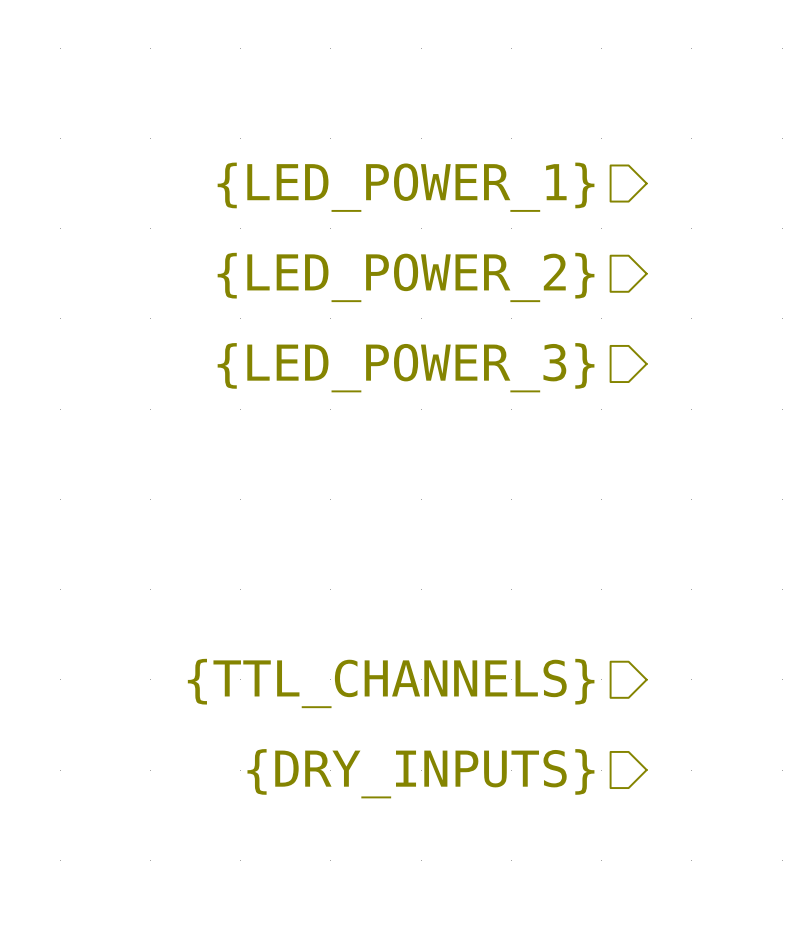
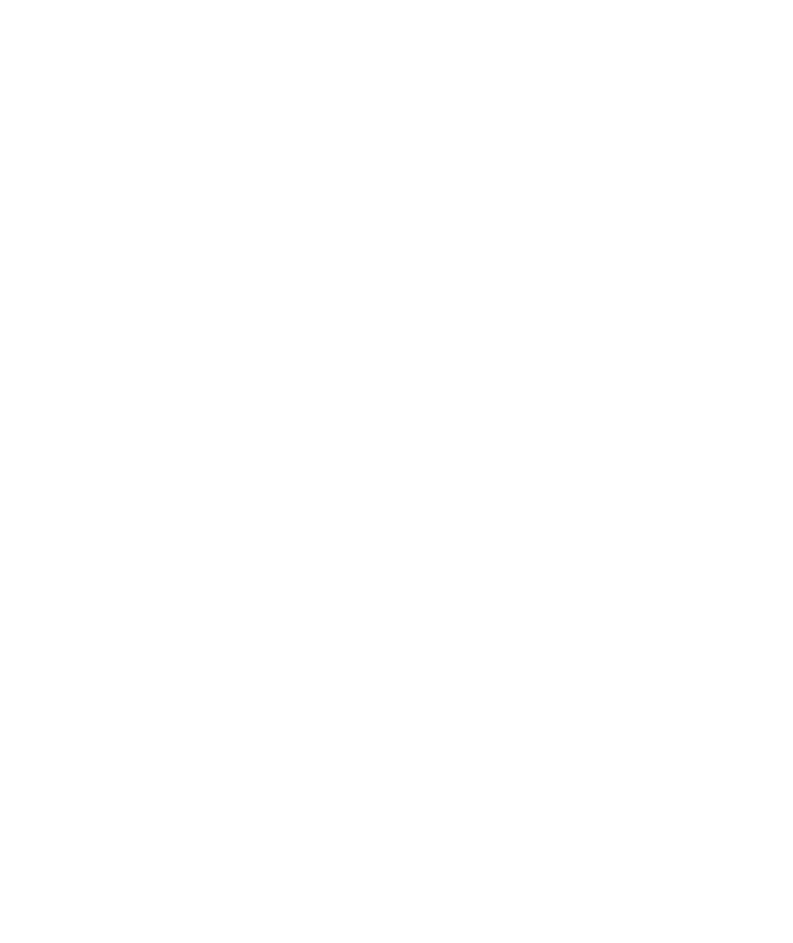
hierarchical label: {LED_POWER_1} (406, 187) -> none
hierarchical label: {LED_POWER_2} (406, 277) -> none
hierarchical label: {LED_POWER_3} (406, 367) -> none
hierarchical label: {TTL_CHANNELS} (391, 683) -> none
hierarchical label: {DRY_INPUTS} (420, 773) -> none

